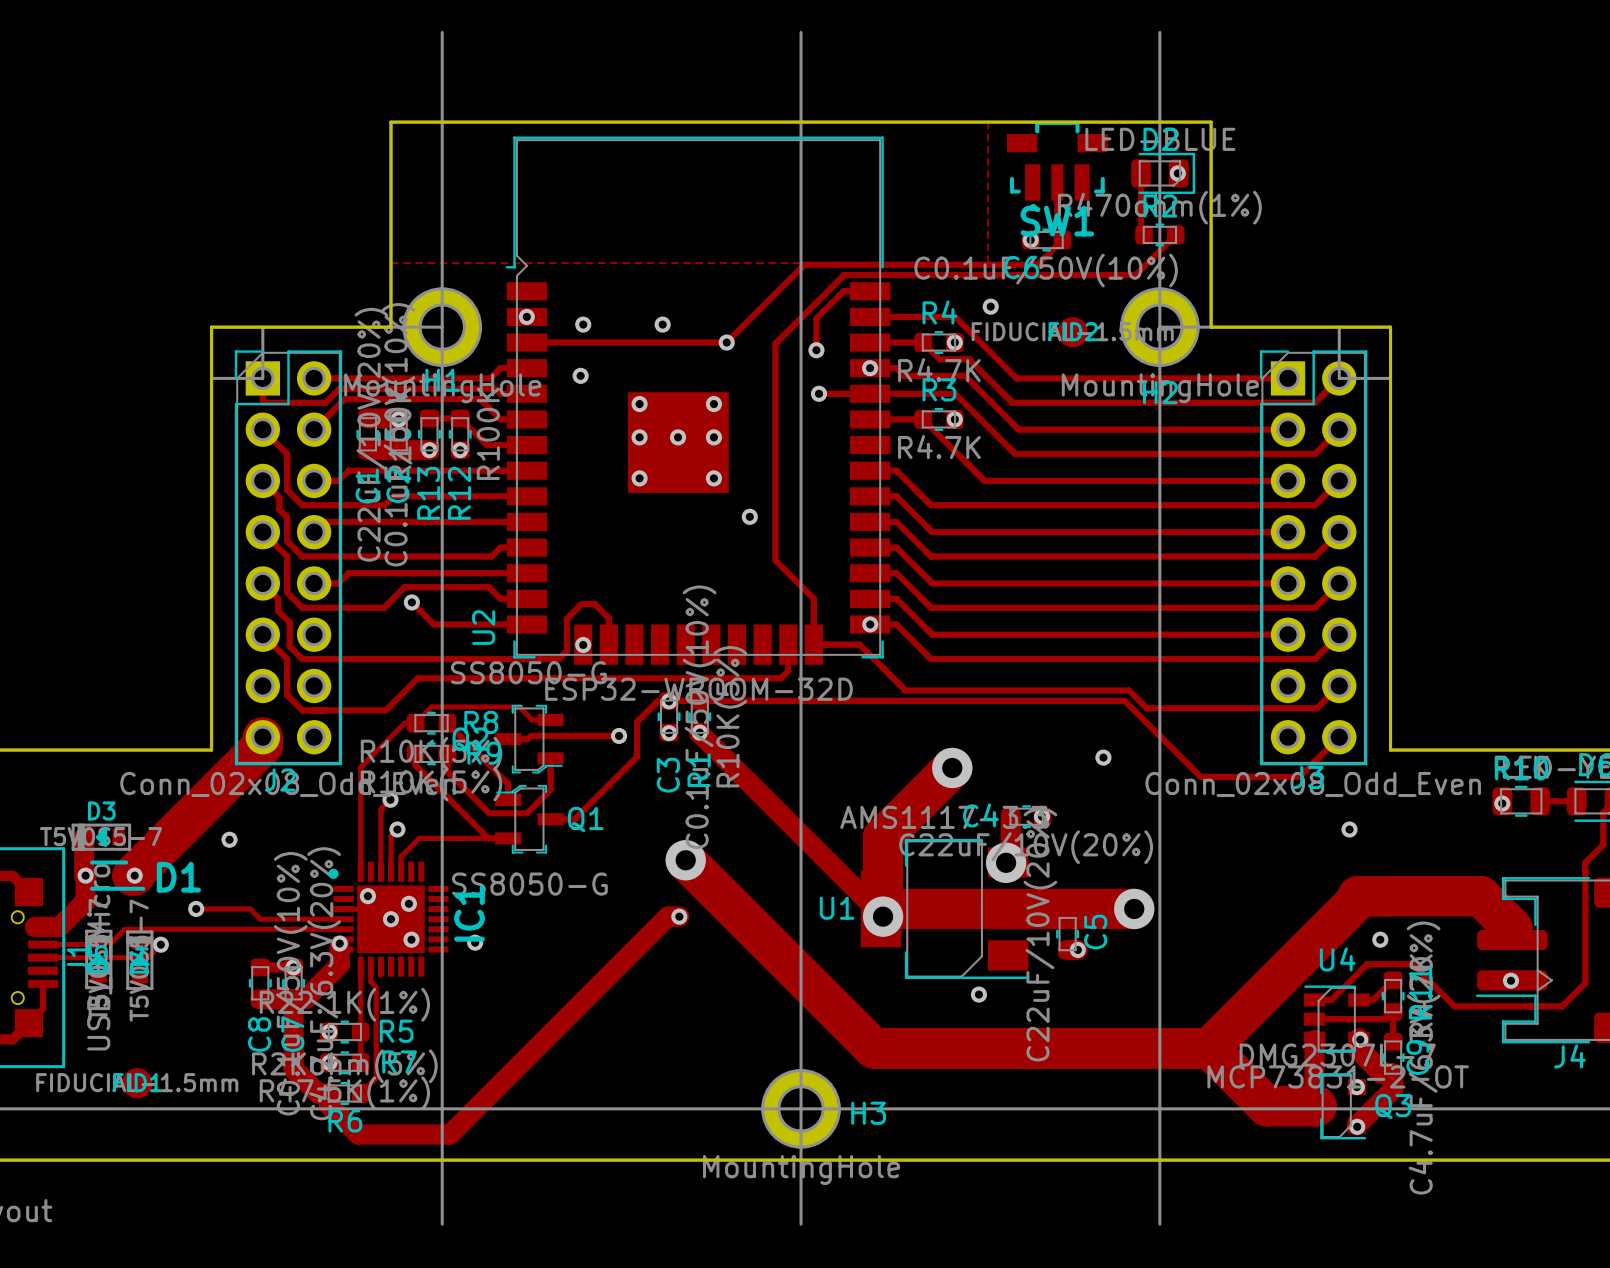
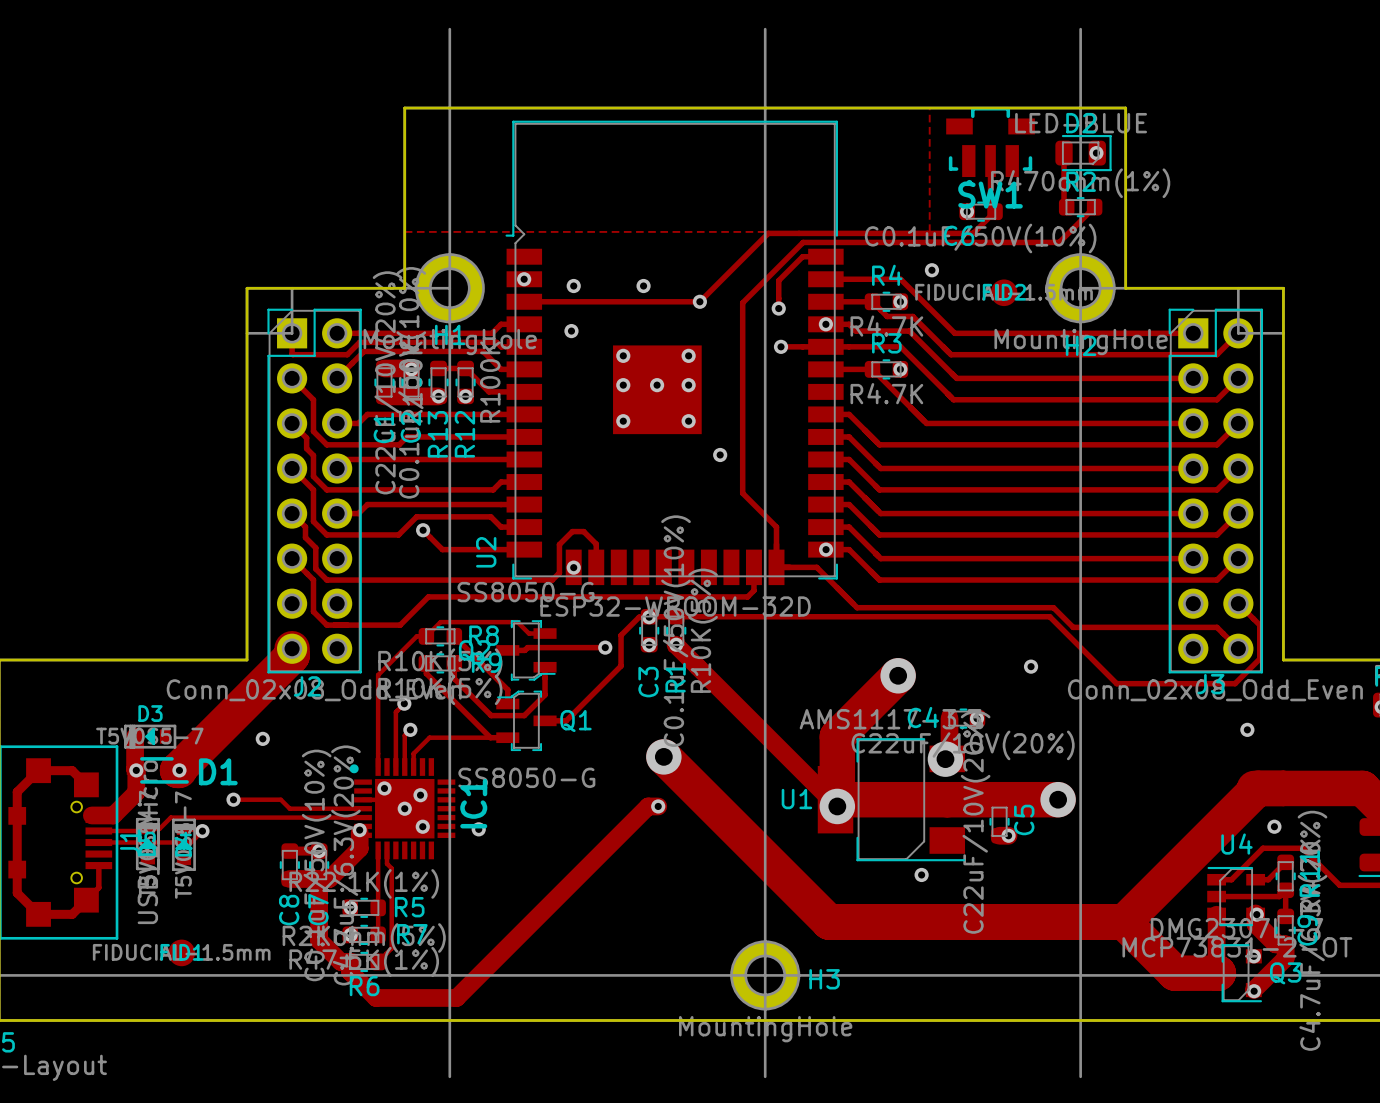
track: (1339, 685) (1316, 708) (1146, 708) -> (1238, 648) (1216, 627) (1073, 627) (1069, 623)
track: (1339, 737) (1299, 776) -> (1238, 603) (1259, 625) (1259, 659) (1235, 683) (1203, 683)

